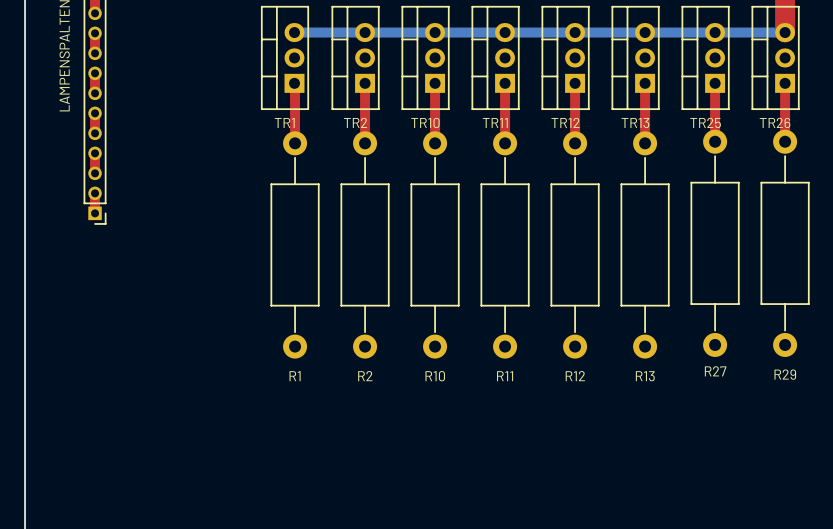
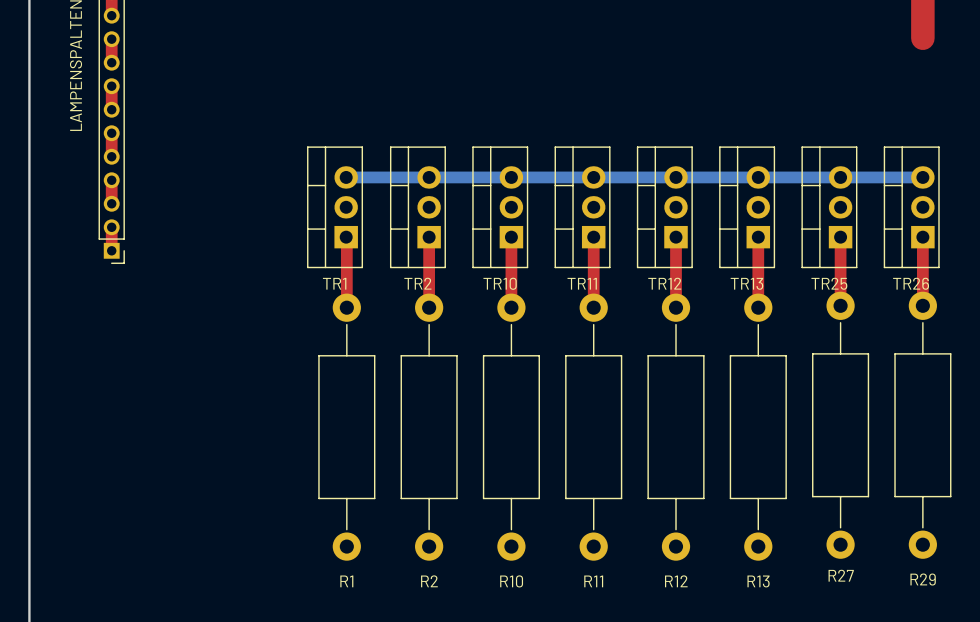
bottom track: (294, 32) (785, 32) -> (346, 177) (922, 177)
TR1 position: (285, 57) -> (335, 207)
TR2 position: (355, 57) -> (417, 207)
TR10 position: (425, 57) -> (500, 207)
TR11 position: (495, 57) -> (582, 207)
TR12 position: (565, 57) -> (664, 207)
TR13 position: (635, 57) -> (747, 207)
TR25 position: (705, 57) -> (829, 207)
TR26 position: (775, 57) -> (911, 207)
top track: (294, 83) (295, 143) -> (346, 237) (346, 307)
top track: (365, 83) (365, 143) -> (429, 237) (429, 307)
top track: (435, 83) (435, 143) -> (511, 237) (511, 307)
top track: (505, 83) (505, 143) -> (593, 237) (593, 307)
top track: (575, 83) (575, 143) -> (676, 237) (676, 307)
top track: (645, 83) (645, 143) -> (758, 237) (758, 307)
top track: (715, 83) (715, 141) -> (840, 237) (840, 305)
top track: (785, 83) (785, 141) -> (922, 237) (922, 305)
R27 position: (715, 243) -> (840, 425)
R29 position: (785, 243) -> (922, 425)
R1 position: (295, 244) -> (346, 427)
R2 position: (365, 244) -> (429, 427)
R10 position: (435, 244) -> (511, 427)
R11 position: (505, 244) -> (593, 427)
R12 position: (575, 244) -> (676, 427)
R13 position: (645, 244) -> (758, 427)

